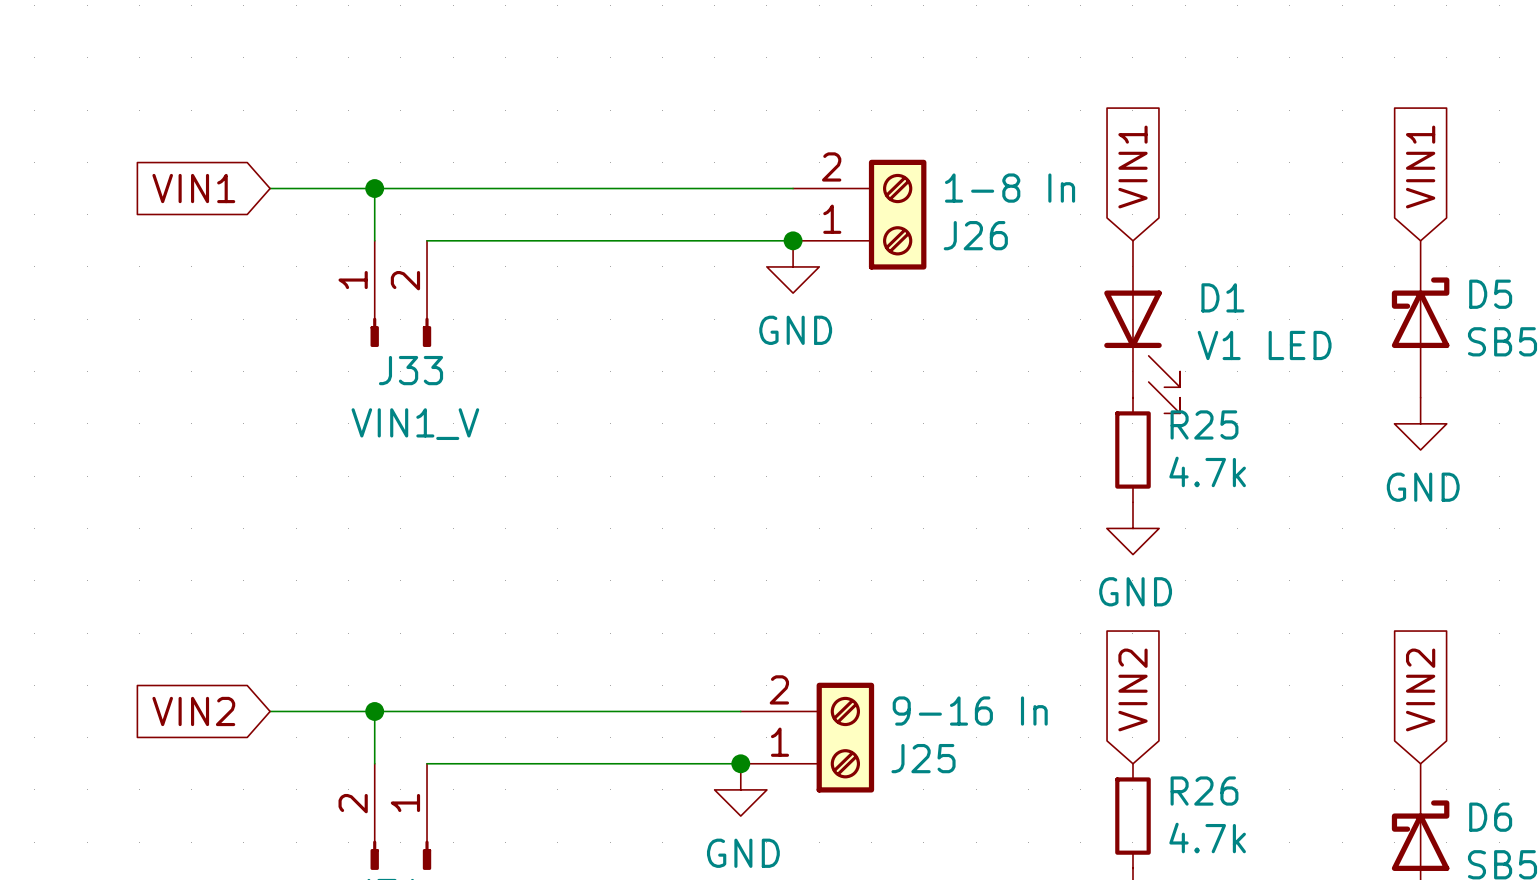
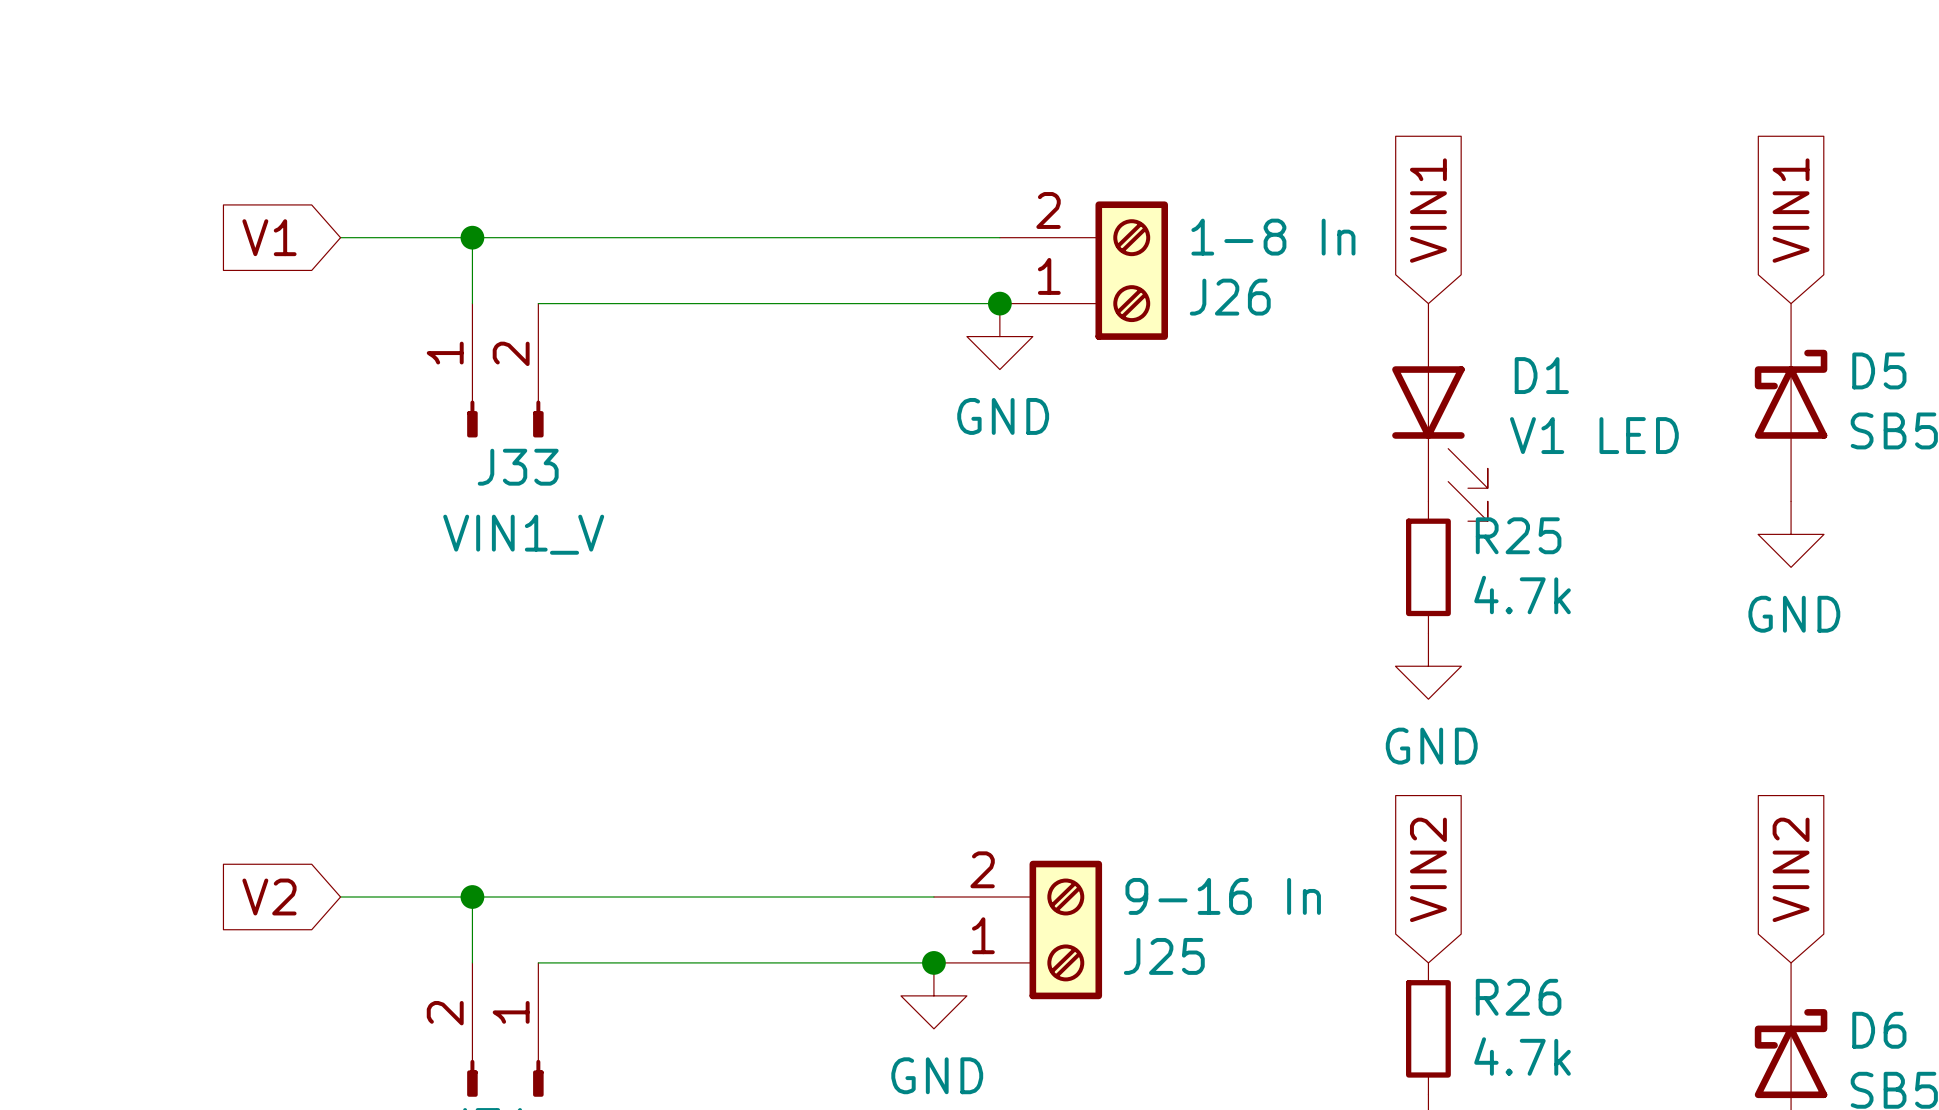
global label: VIN1 (193, 188) -> V1 (269, 237)
global label: VIN2 (193, 711) -> V2 (269, 897)

